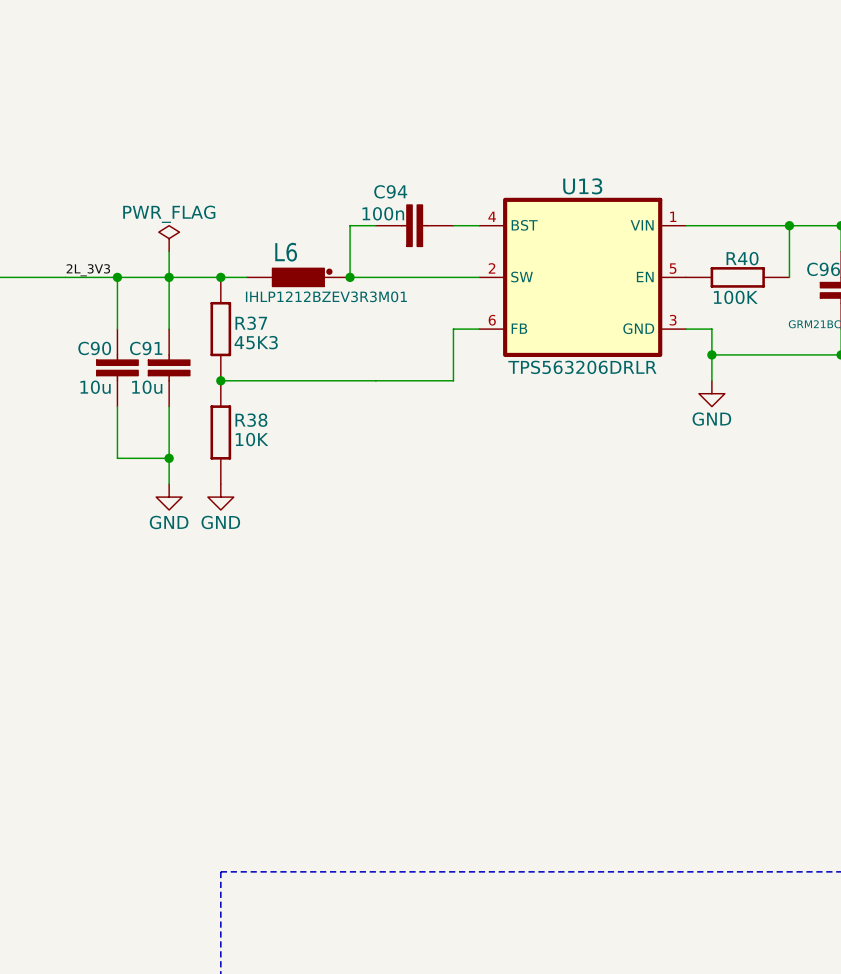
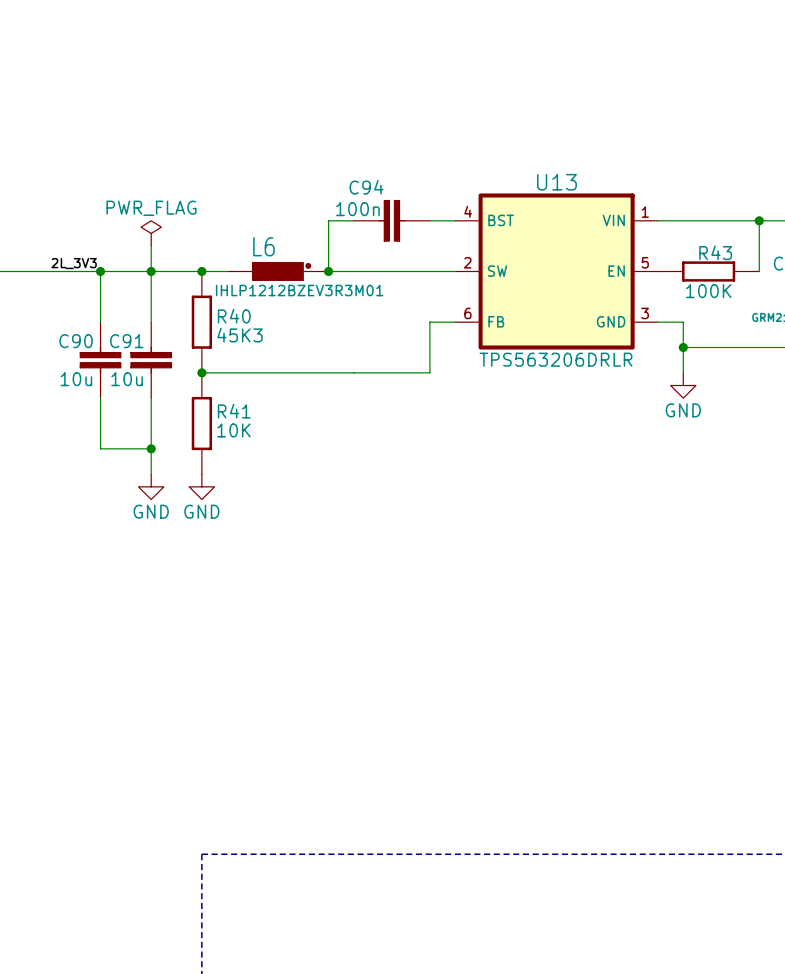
R40 name: R40 (742, 258) -> R43 (715, 252)
R37 name: R37 (251, 323) -> R40 (234, 316)
R38 name: R38 (251, 420) -> R41 (234, 411)

